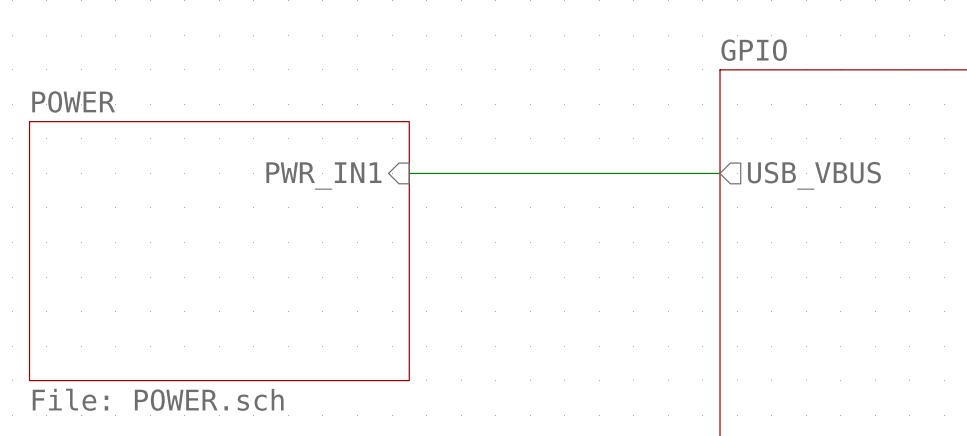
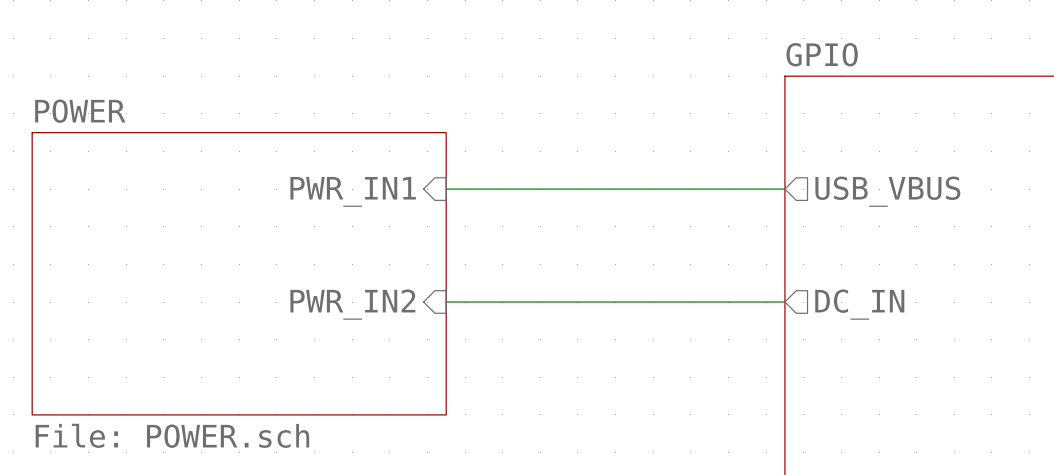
wire: none -> (446, 302) (784, 302)
sheet pin: none -> PWR_IN2 (352, 304)
sheet pin: none -> DC_IN (859, 304)

